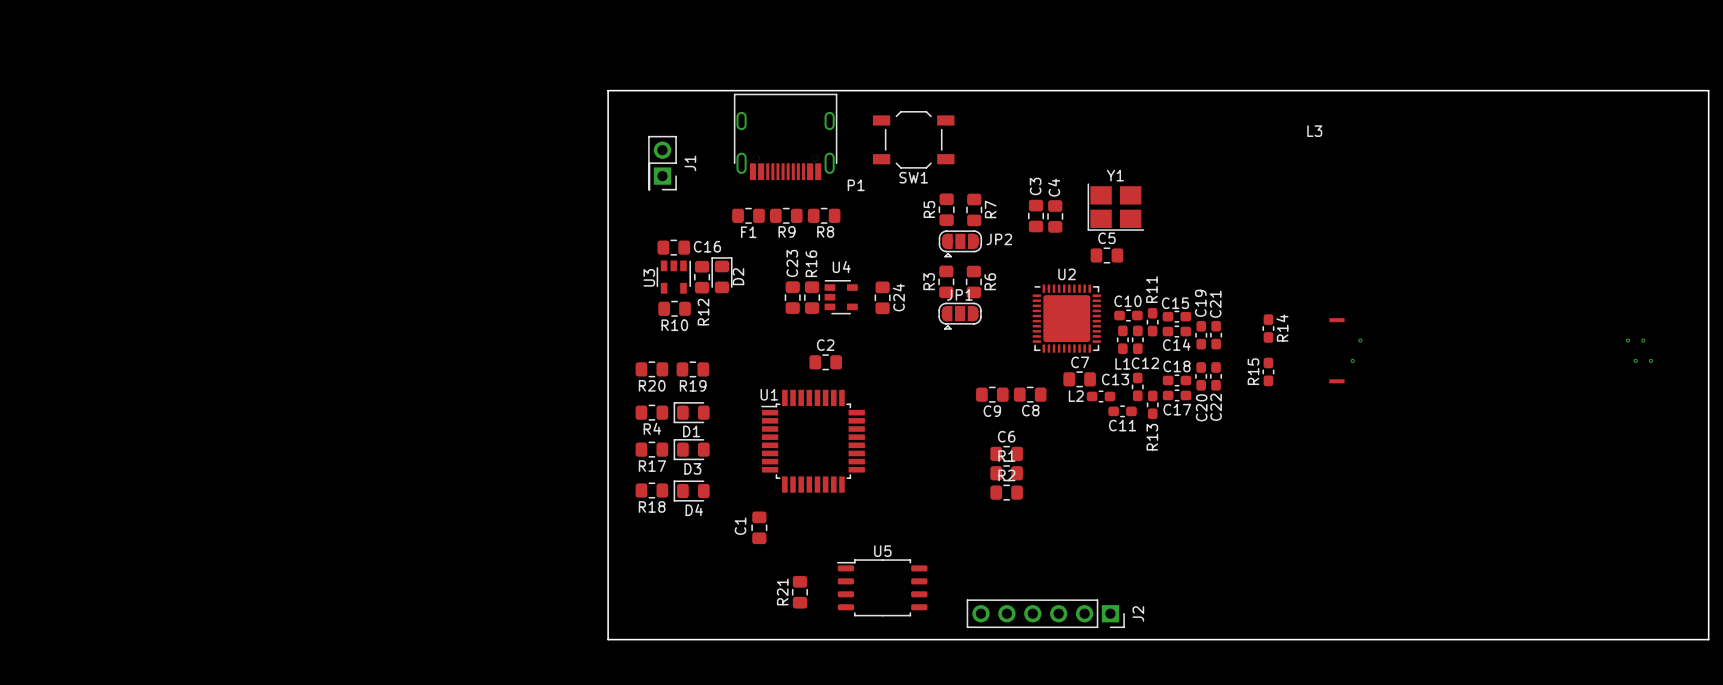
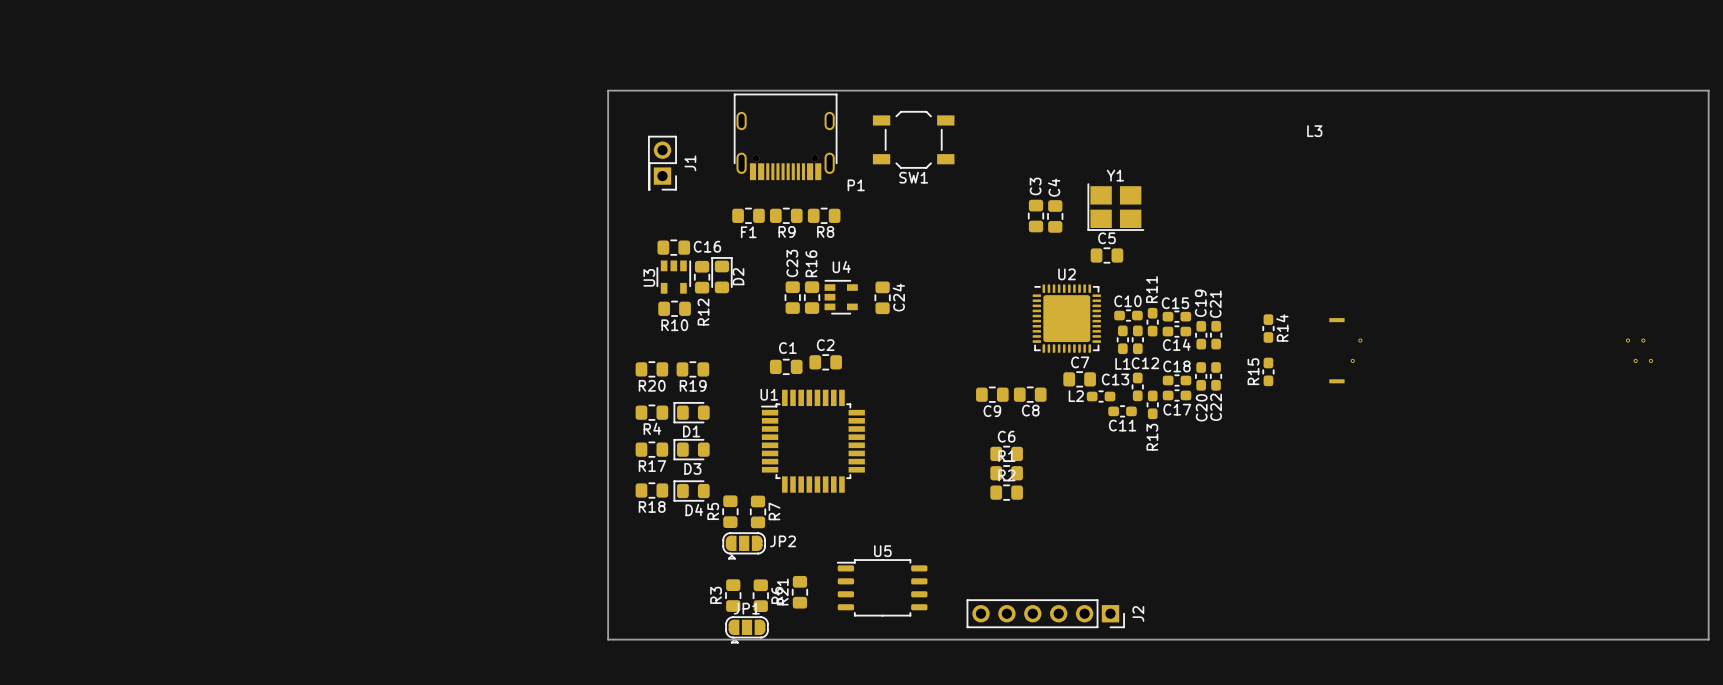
R5 position: (946, 209) -> (730, 511)
R7 position: (974, 209) -> (758, 511)
JP2 position: (960, 243) -> (744, 545)
R3 position: (946, 281) -> (733, 595)
R6 position: (973, 281) -> (760, 595)
JP1 position: (960, 316) -> (747, 629)
C1 rotation: 0° (759, 527) -> 90° clockwise (786, 366)
C1 position: (759, 527) -> (786, 366)

